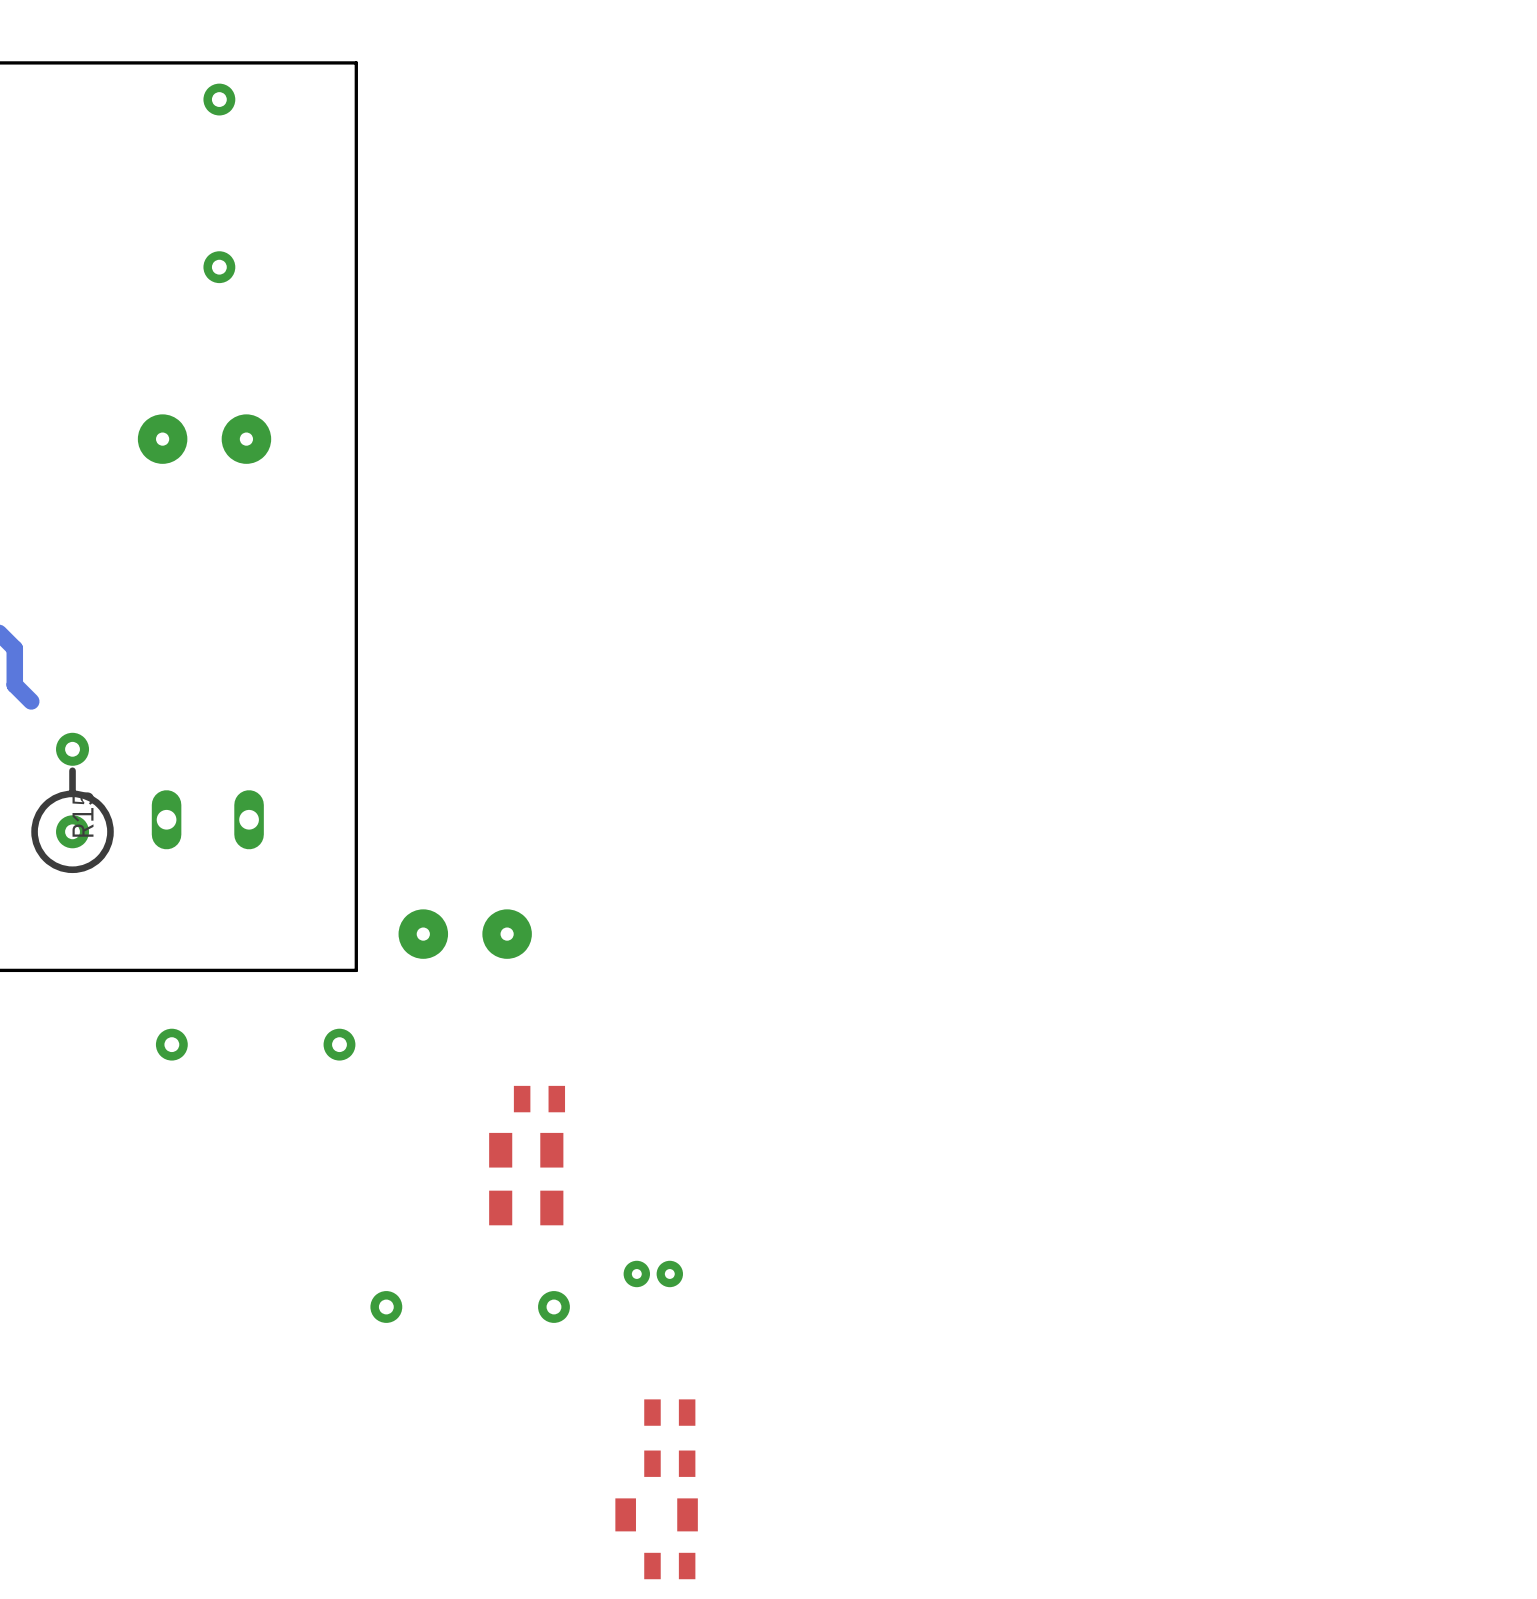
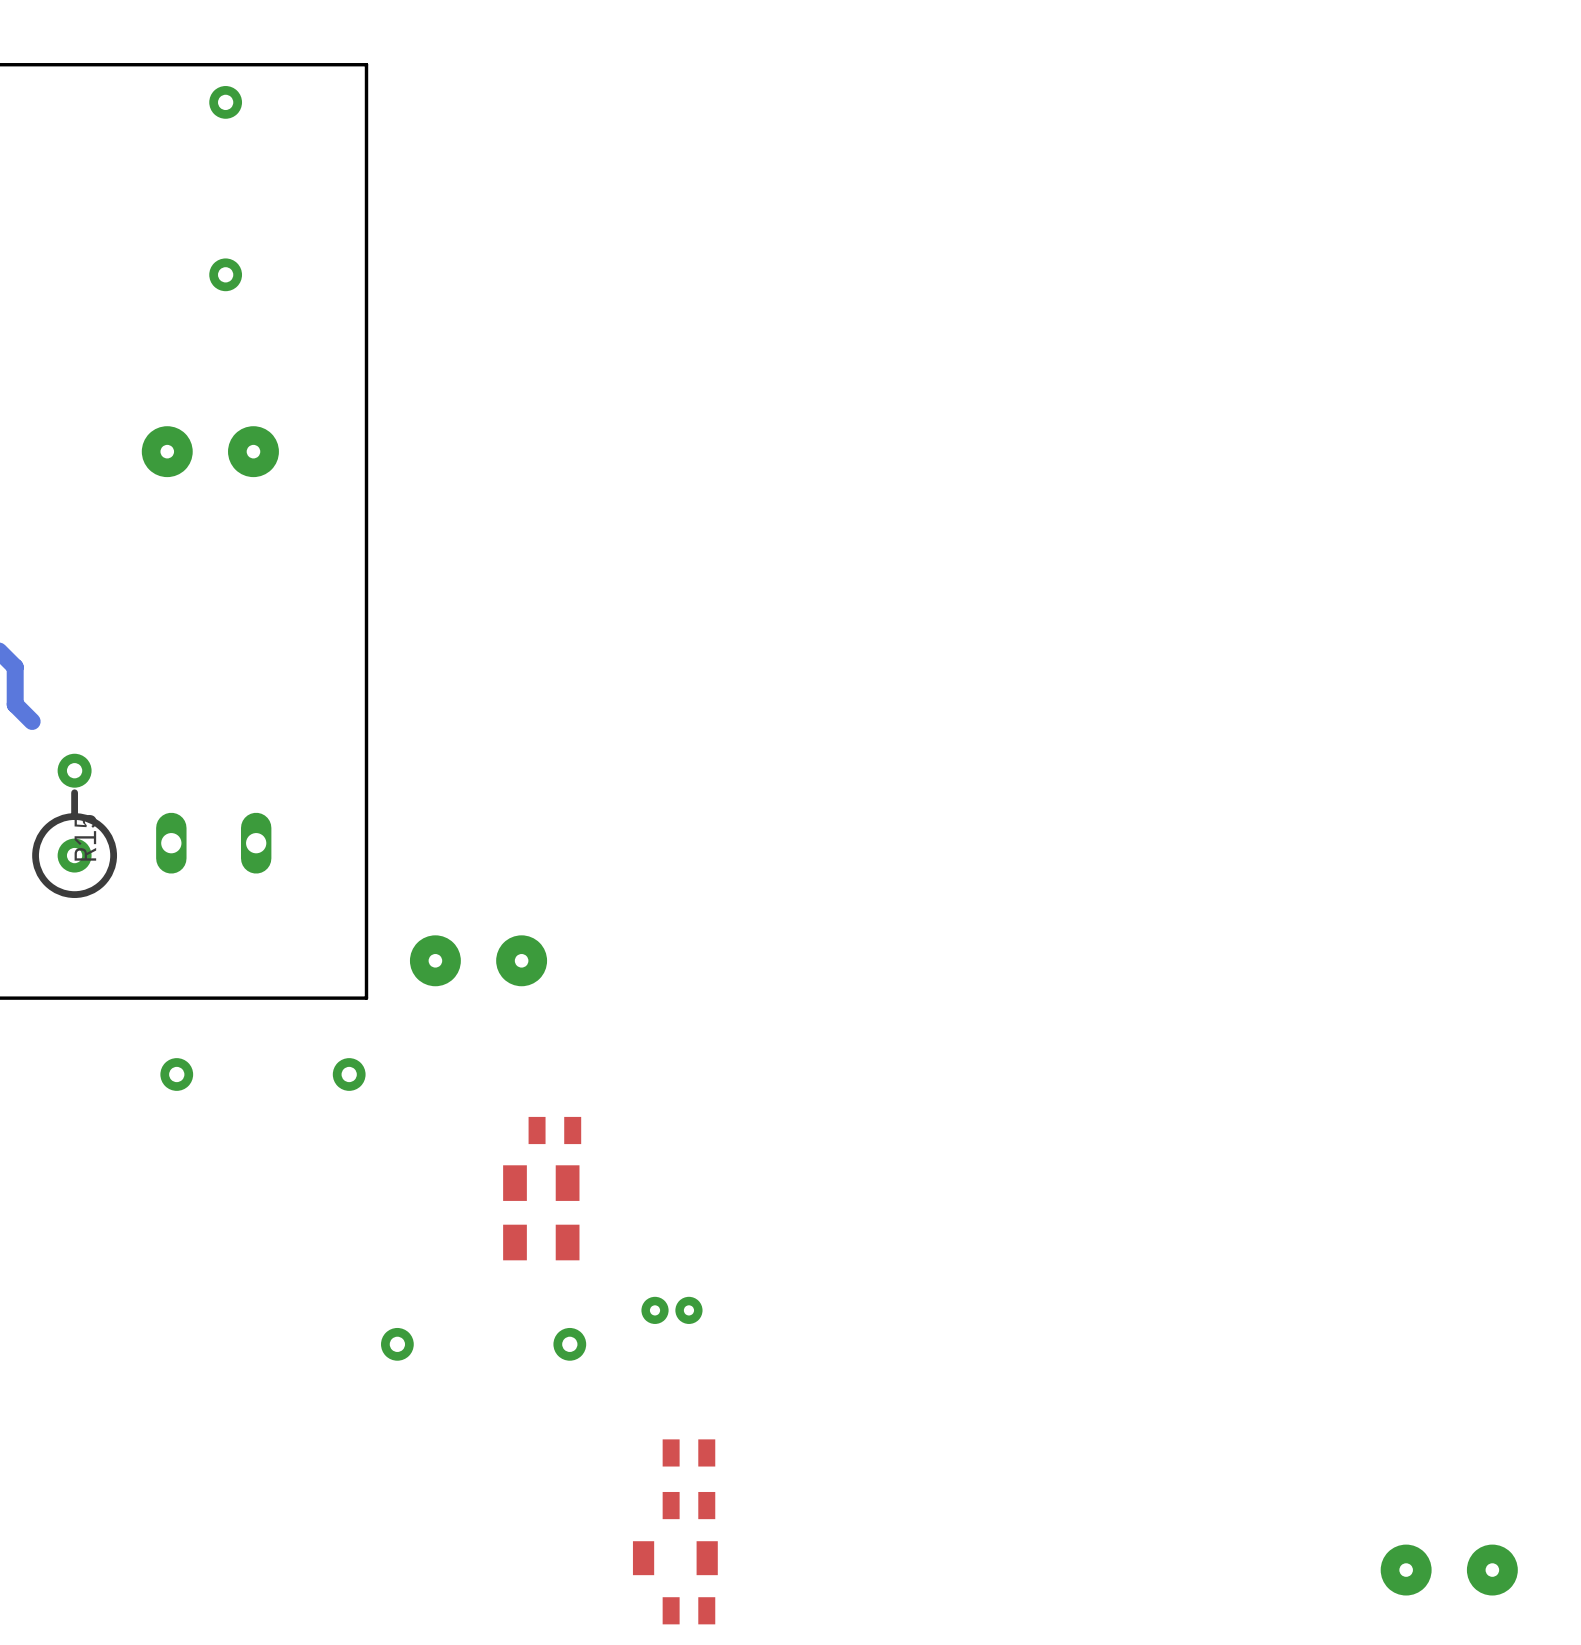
part: none -> (1449, 1570)

